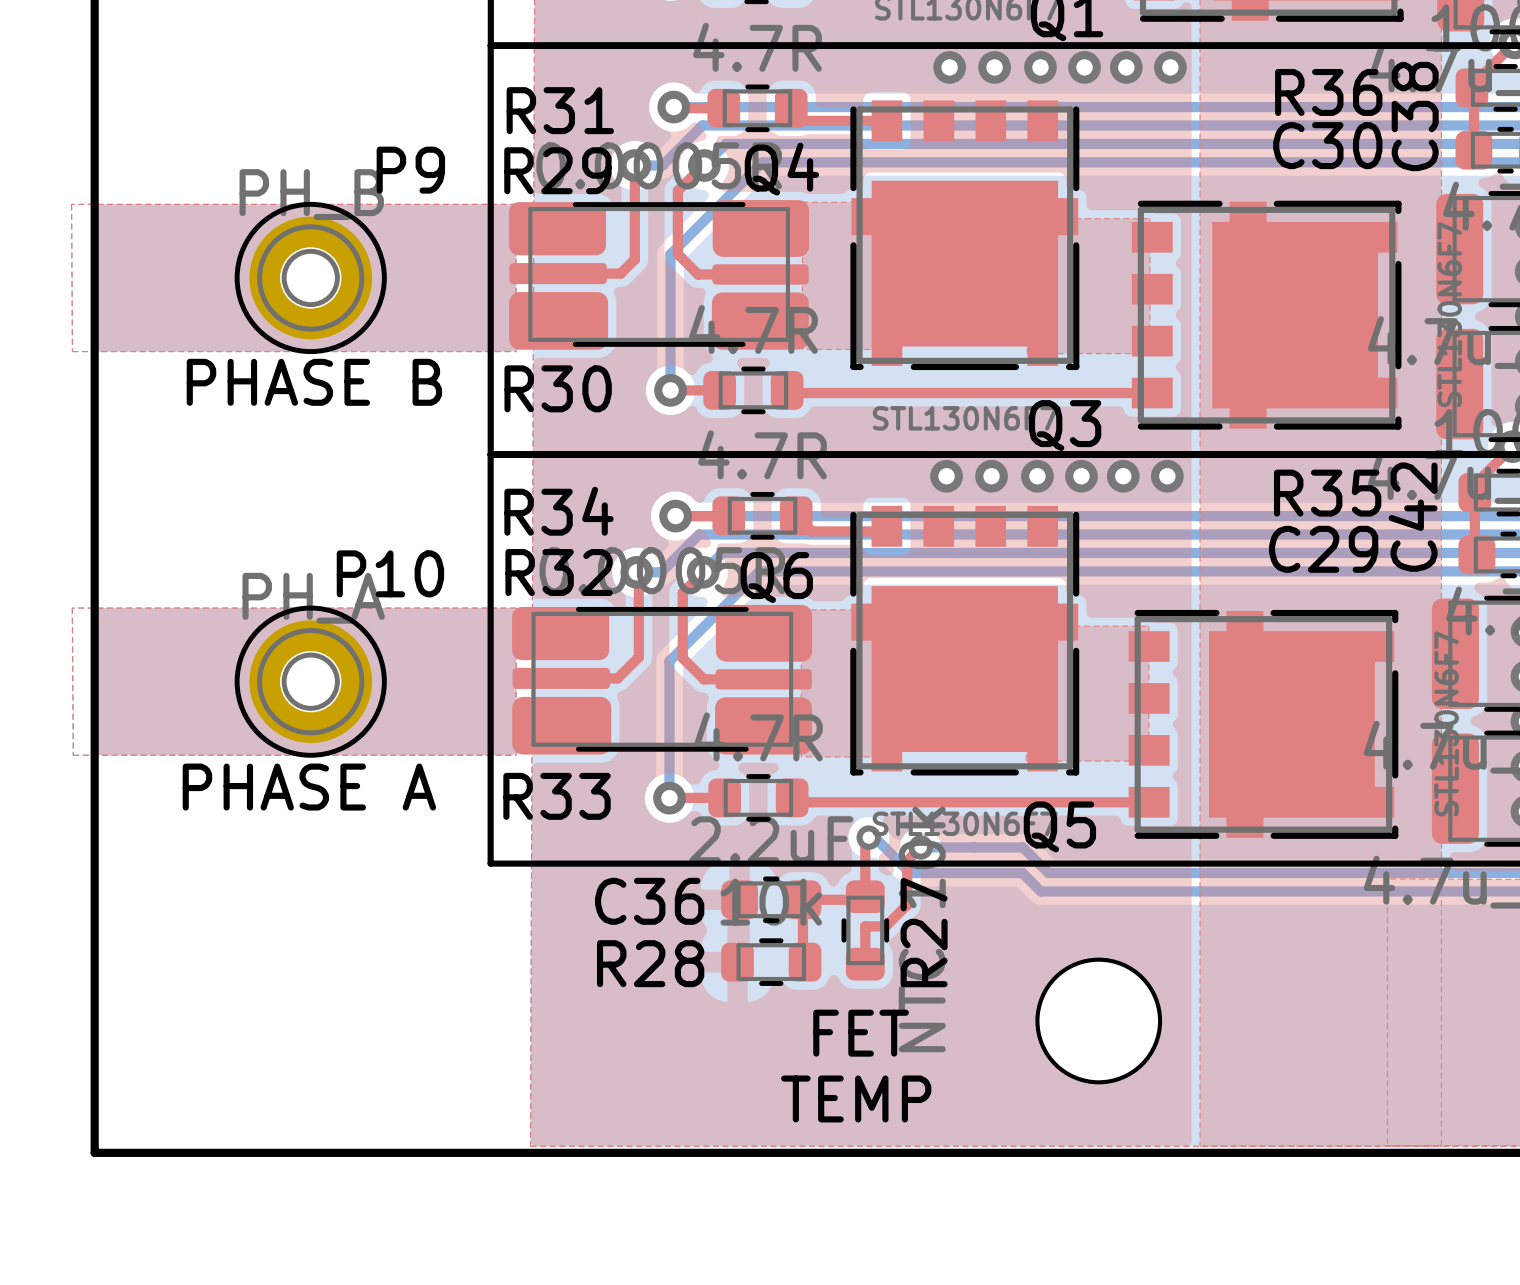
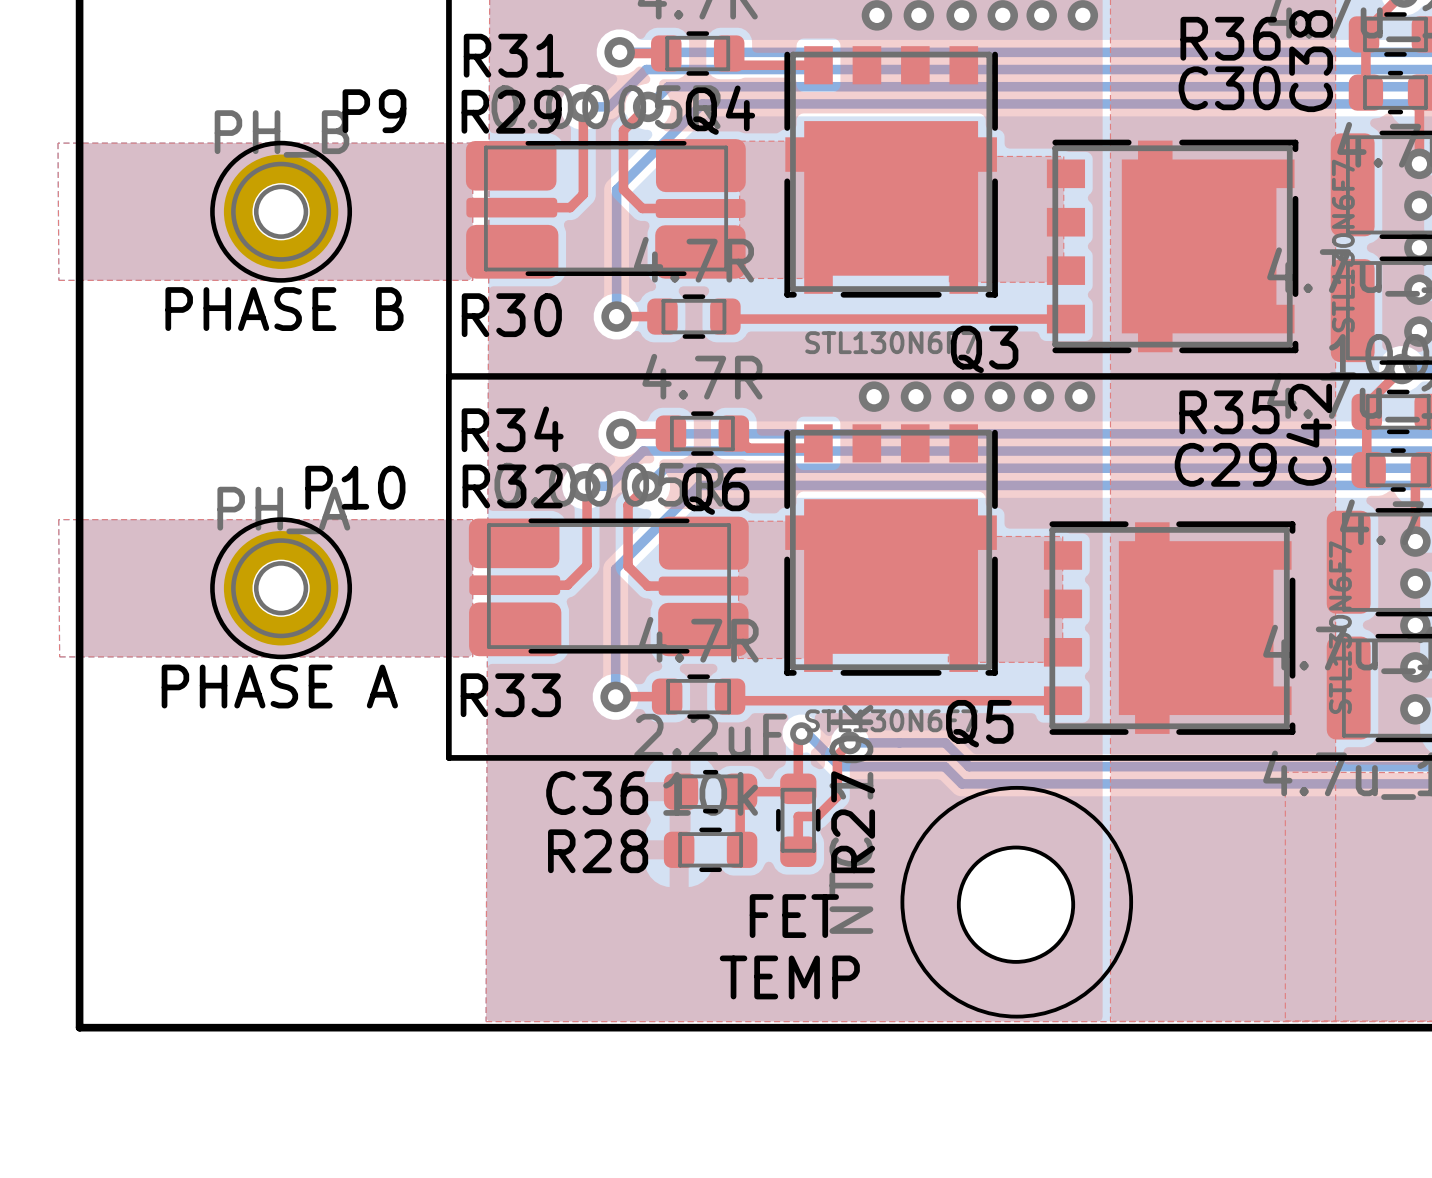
drawing: none -> [900, 785, 1134, 1019]

